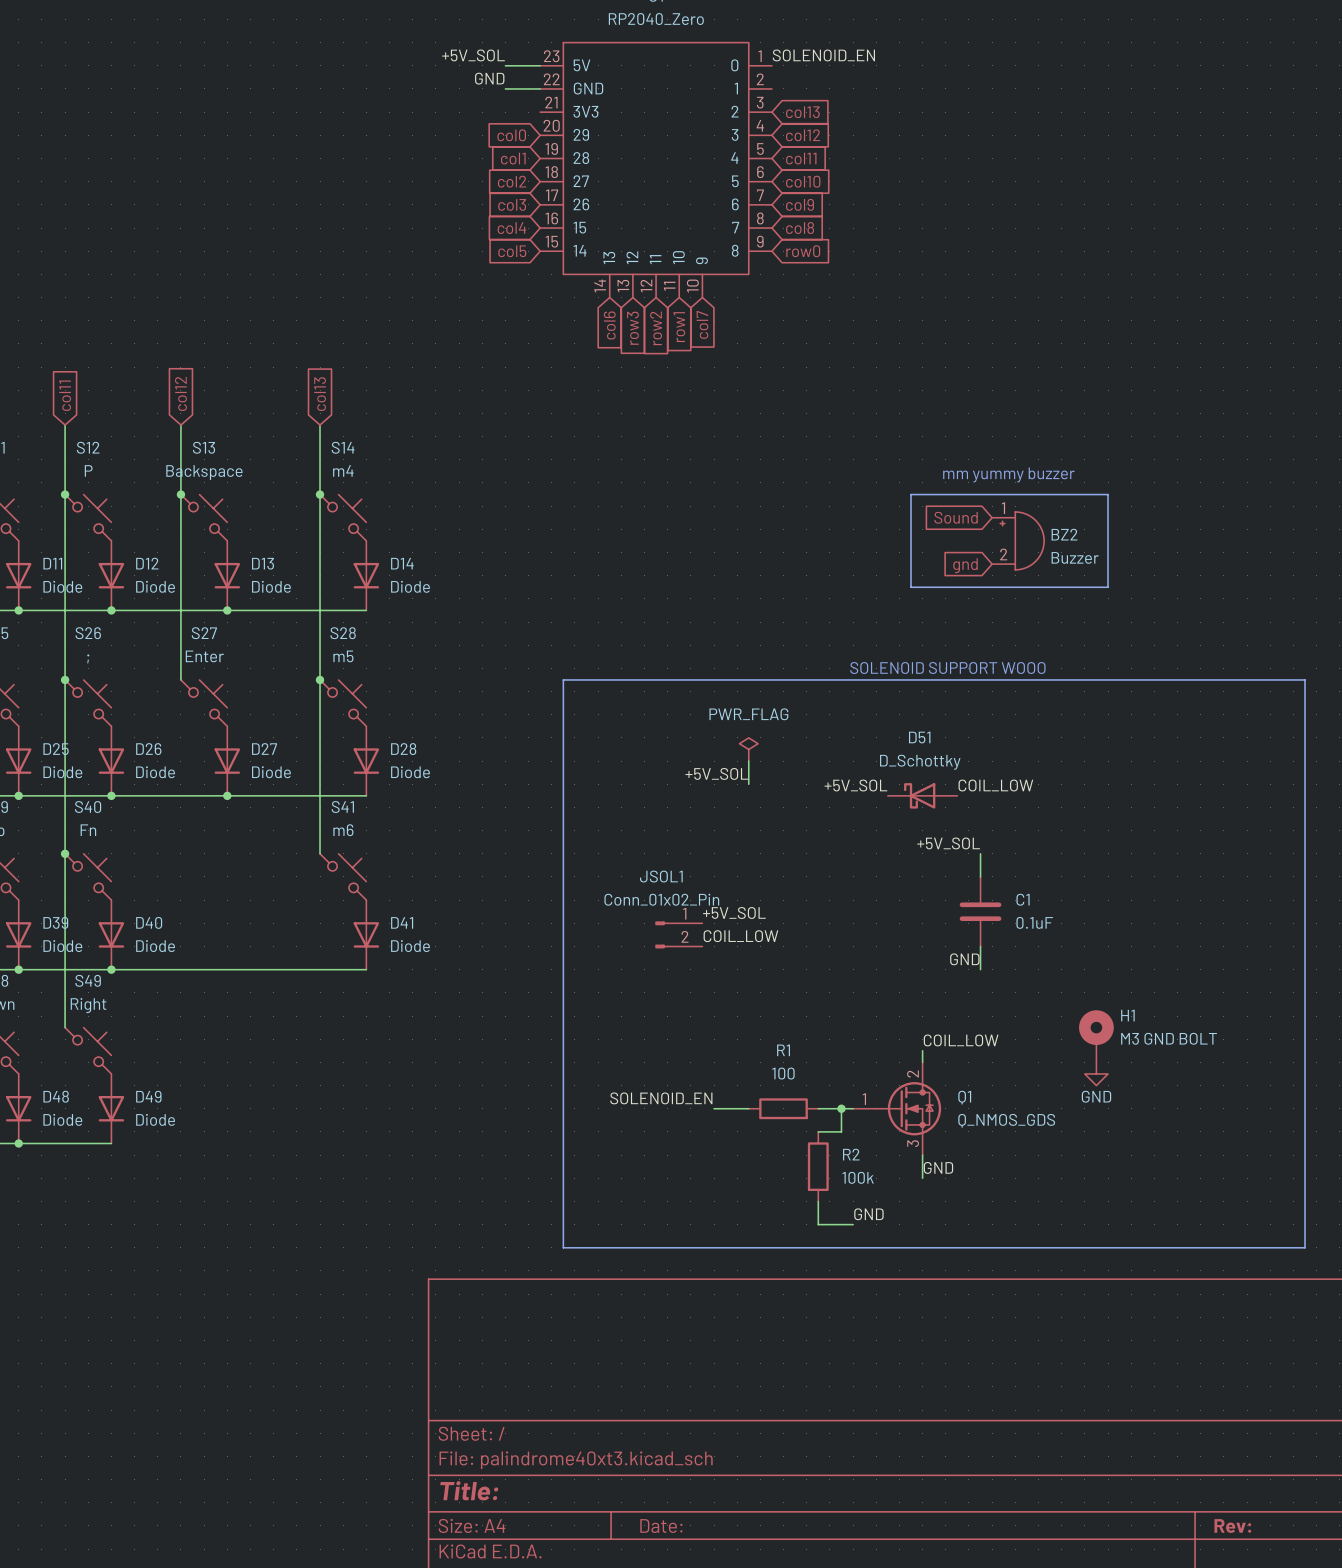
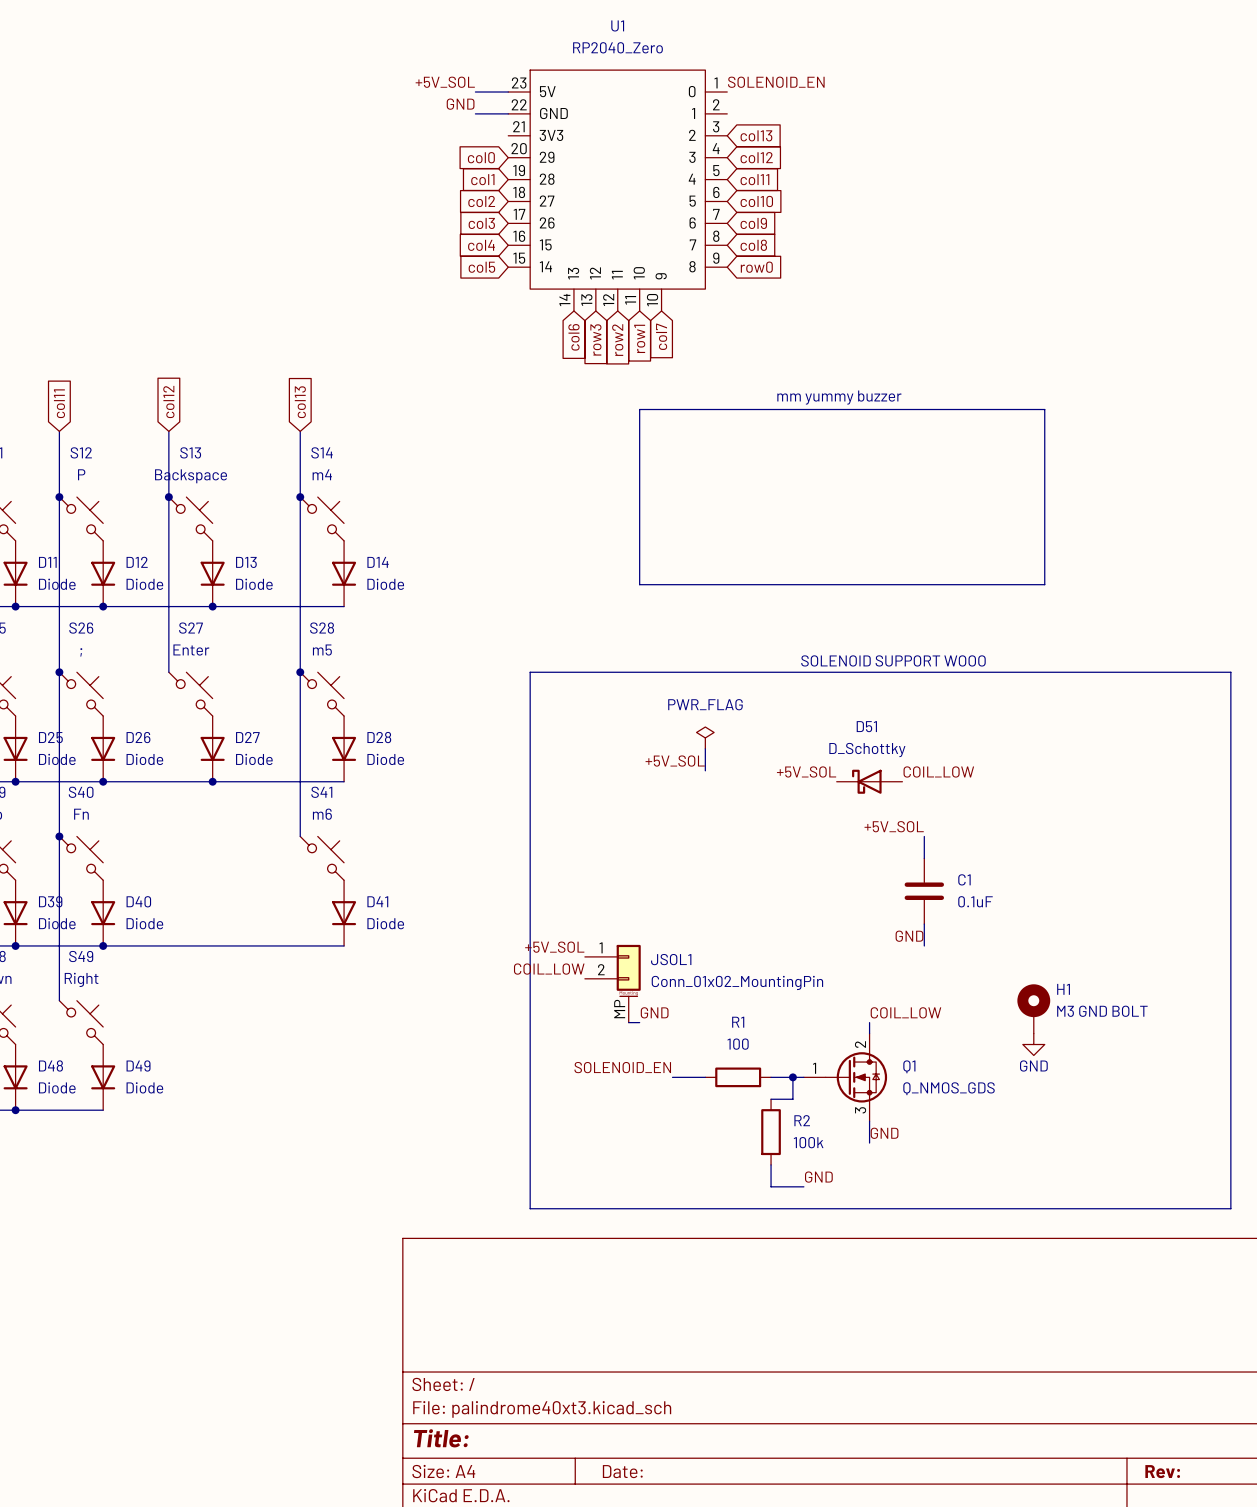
text position: mm yummy buzzer (1008, 474) -> mm yummy buzzer (839, 397)
line: (1108, 494) (911, 494) (911, 587) -> (1044, 497) (1044, 409) (639, 409) (639, 584) (858, 584)
global label: Sound (956, 517) -> none
BZ2: Buzzer (1018, 540) -> none
global label: gnd (965, 565) -> none
JSOL1 name position: JSOL1 (661, 876) -> JSOL1 (671, 959)
JSOL1 value: Conn_01x02_Pin (661, 899) -> Conn_01x02_MountingPin (737, 982)
label position: +5V_SOL (734, 912) -> +5V_SOL (554, 947)
JSOL1 symbol: [655, 921, 703, 949] -> [584, 944, 641, 1023]
label position: COIL_LOW (740, 936) -> COIL_LOW (549, 969)
label: none -> GND (654, 1012)
wire: none -> (628, 1022) (639, 1022)

